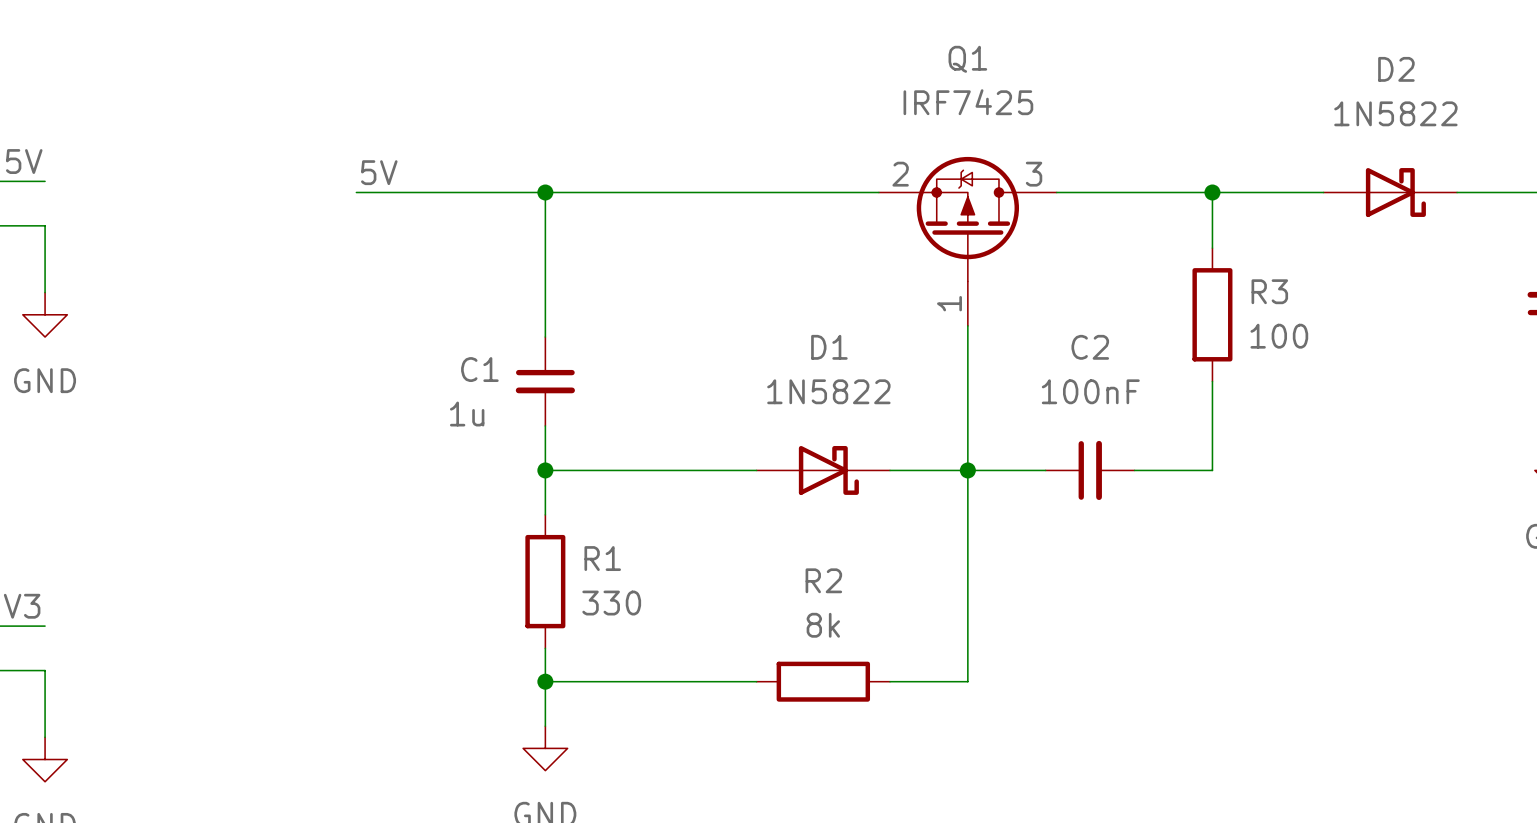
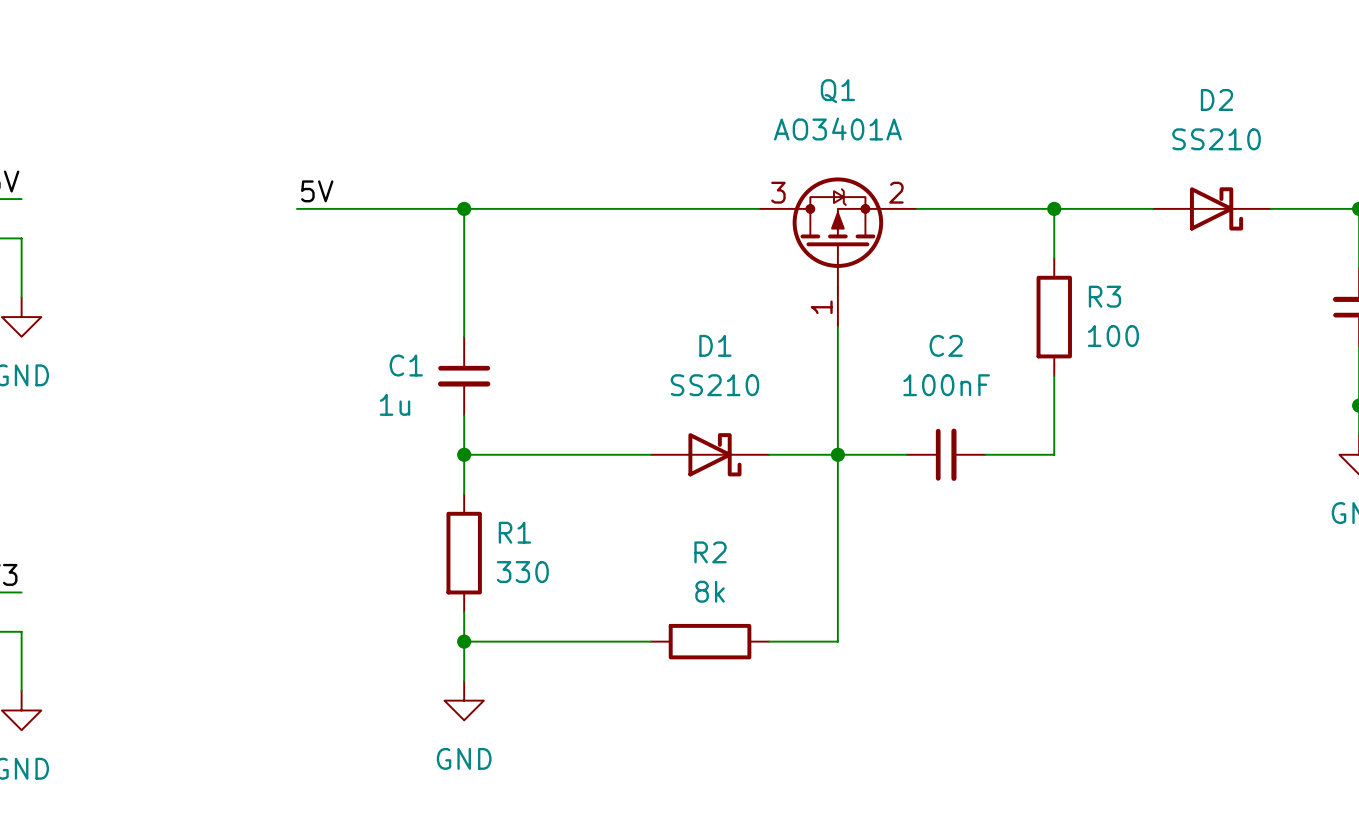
Q1 value: IRF7425 (968, 102) -> AO3401A (837, 129)
D2 value: 1N5822 (1395, 113) -> SS210 (1216, 139)
Q1 flip: as is (967, 219) -> left-right (837, 232)
D1 value: 1N5822 (828, 391) -> SS210 (714, 385)

